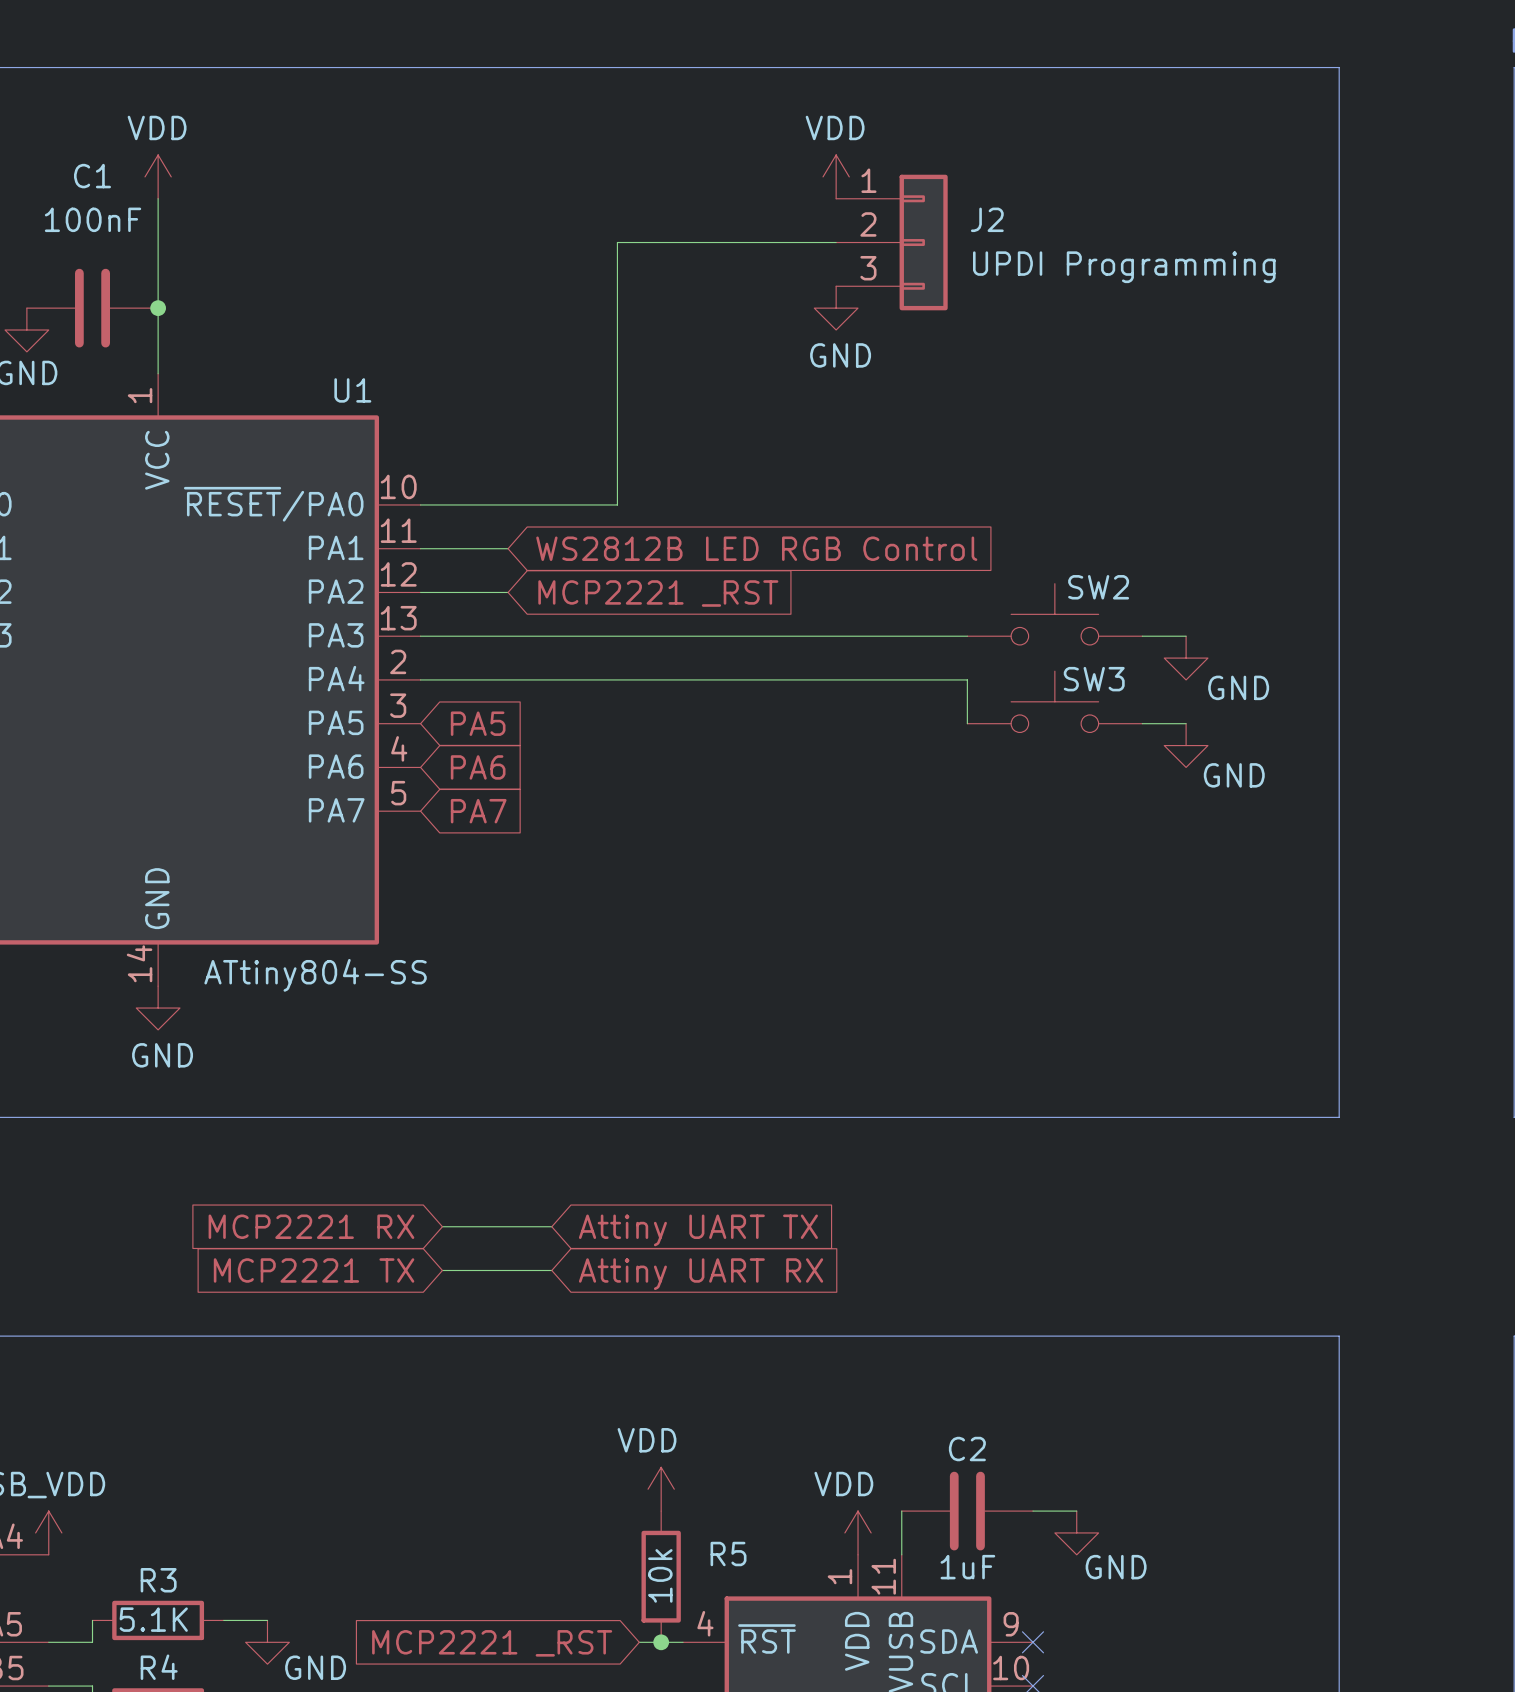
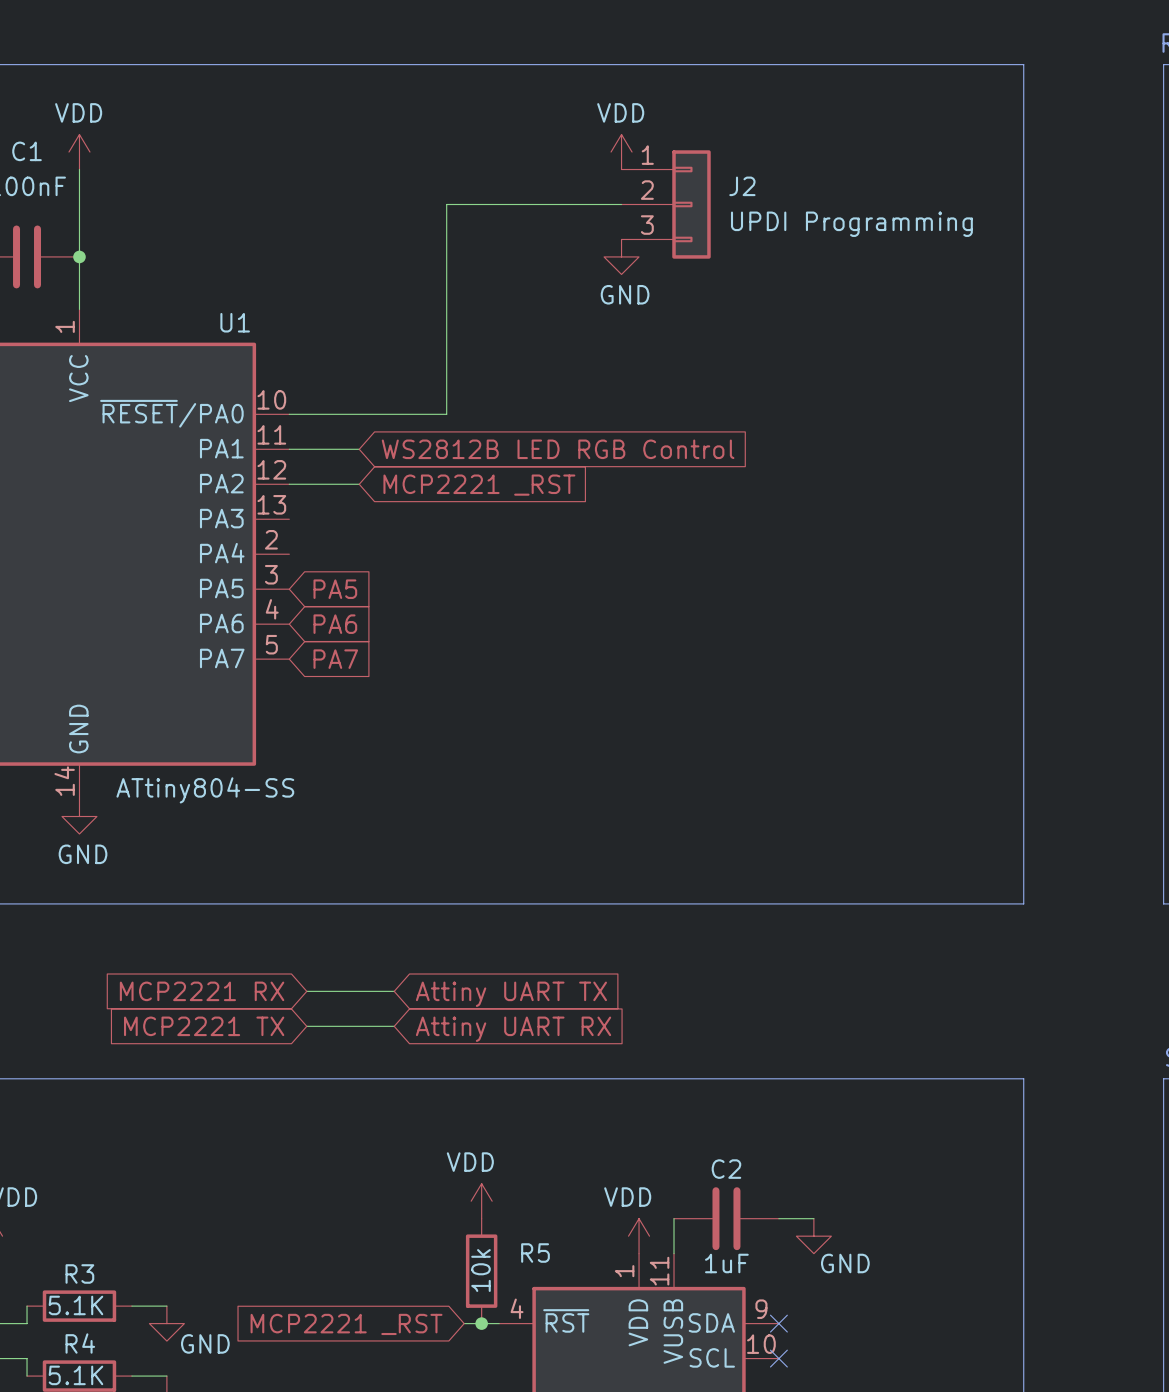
SW2: (1054, 614) -> none
wire: (420, 636) (967, 636) -> none
wire: (1142, 636) (1186, 636) -> none
power symbol: GND (1186, 658) -> none
wire: (420, 679) (967, 679) (967, 723) -> none
SW3: (1054, 701) -> none
wire: (1142, 723) (1186, 723) -> none
power symbol: GND (1186, 745) -> none

